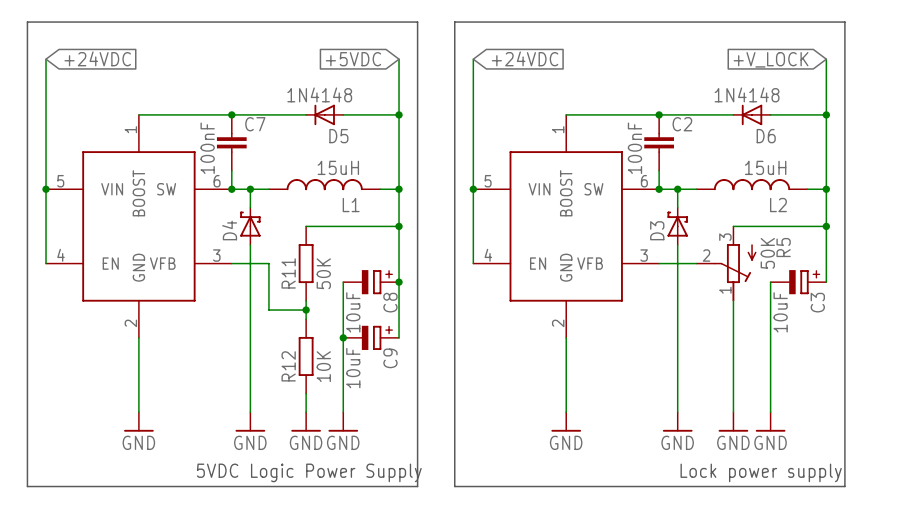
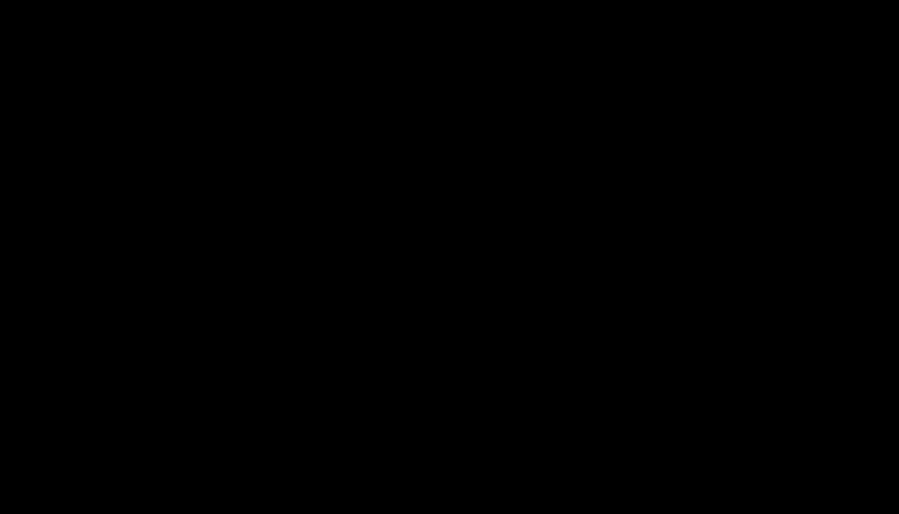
line: (27, 22) (417, 22) (417, 486) (27, 486) (27, 22) -> none
line: (454, 22) (844, 22) (844, 486) (454, 486) (454, 22) -> none
global label: +24VDC (97, 58) -> none
global label: +24VDC (525, 58) -> none
wire: (46, 59) (46, 263) -> none
global label: +5VDC (353, 59) -> none
wire: (399, 59) (399, 337) -> none
wire: (473, 59) (473, 263) -> none
global label: +V_LOCK (771, 59) -> none
wire: (826, 59) (826, 282) -> none
wire: (138, 114) (306, 114) -> none
junction: (231, 114) -> none
D5: 1N4148 (324, 114) -> none
wire: (343, 114) (399, 114) -> none
junction: (399, 114) -> none
wire: (566, 114) (733, 114) -> none
junction: (659, 114) -> none
D6: 1N4148 (752, 114) -> none
wire: (770, 114) (826, 114) -> none
junction: (826, 114) -> none
C7: 100nF (231, 142) -> none
C2: 100nF (659, 142) -> none
wire: (231, 170) (231, 189) (268, 189) -> none
wire: (659, 170) (659, 189) (696, 189) -> none
L1: 15uH (324, 184) -> none
L2: 15uH (752, 184) -> none
junction: (46, 189) -> none
junction: (231, 189) -> none
wire: (250, 189) (250, 207) -> none
junction: (250, 189) -> none
wire: (380, 189) (399, 189) -> none
junction: (399, 189) -> none
junction: (473, 189) -> none
junction: (659, 189) -> none
wire: (677, 189) (677, 207) -> none
junction: (677, 189) -> none
wire: (807, 189) (826, 189) -> none
junction: (826, 189) -> none
part: (138, 226) -> none
D4: (250, 226) -> none
wire: (306, 226) (399, 226) -> none
junction: (399, 226) -> none
part: (566, 226) -> none
D3: (677, 226) -> none
wire: (733, 226) (826, 226) -> none
junction: (826, 226) -> none
wire: (250, 244) (250, 412) -> none
wire: (677, 244) (677, 412) -> none
wire: (231, 263) (268, 263) (268, 310) (306, 310) -> none
R11: 50K (306, 263) -> none
wire: (659, 263) (696, 263) -> none
R5: 50K (726, 263) -> none
wire: (343, 282) (343, 412) -> none
C8: 10uF (371, 282) -> none
junction: (399, 282) -> none
wire: (770, 282) (770, 412) -> none
C3: 10uF (798, 282) -> none
wire: (306, 300) (306, 319) -> none
wire: (733, 300) (733, 412) -> none
junction: (306, 310) -> none
wire: (138, 337) (138, 412) -> none
junction: (343, 337) -> none
C9: 10uF (371, 337) -> none
wire: (566, 337) (566, 412) -> none
R12: 10K (306, 356) -> none
wire: (306, 393) (306, 412) -> none
power symbol: GND (138, 421) -> none
power symbol: GND (250, 421) -> none
power symbol: GND (306, 421) -> none
power symbol: GND (343, 421) -> none
power symbol: GND (566, 421) -> none
power symbol: GND (677, 421) -> none
power symbol: GND (733, 421) -> none
power symbol: GND (770, 421) -> none
text: 5VDC Logic Power Supply (309, 472) -> none
text: Lock power supply (761, 472) -> none

